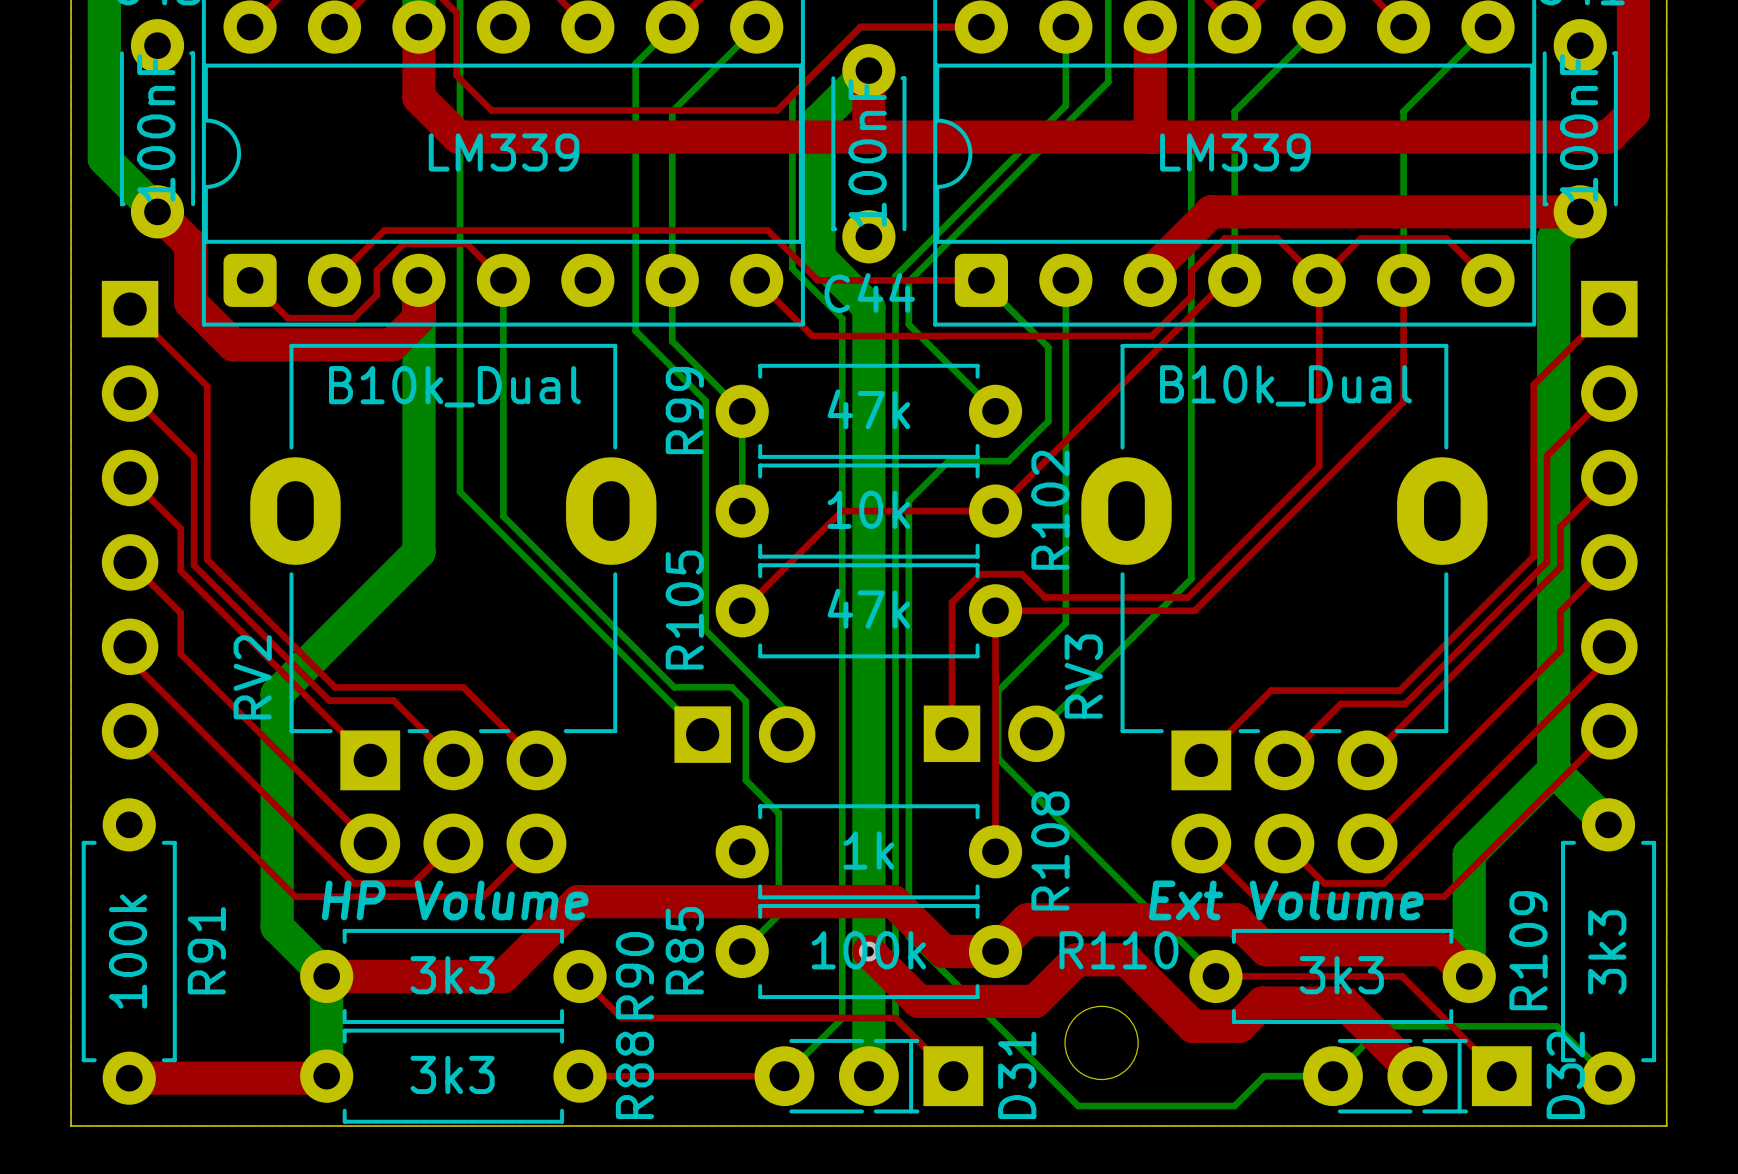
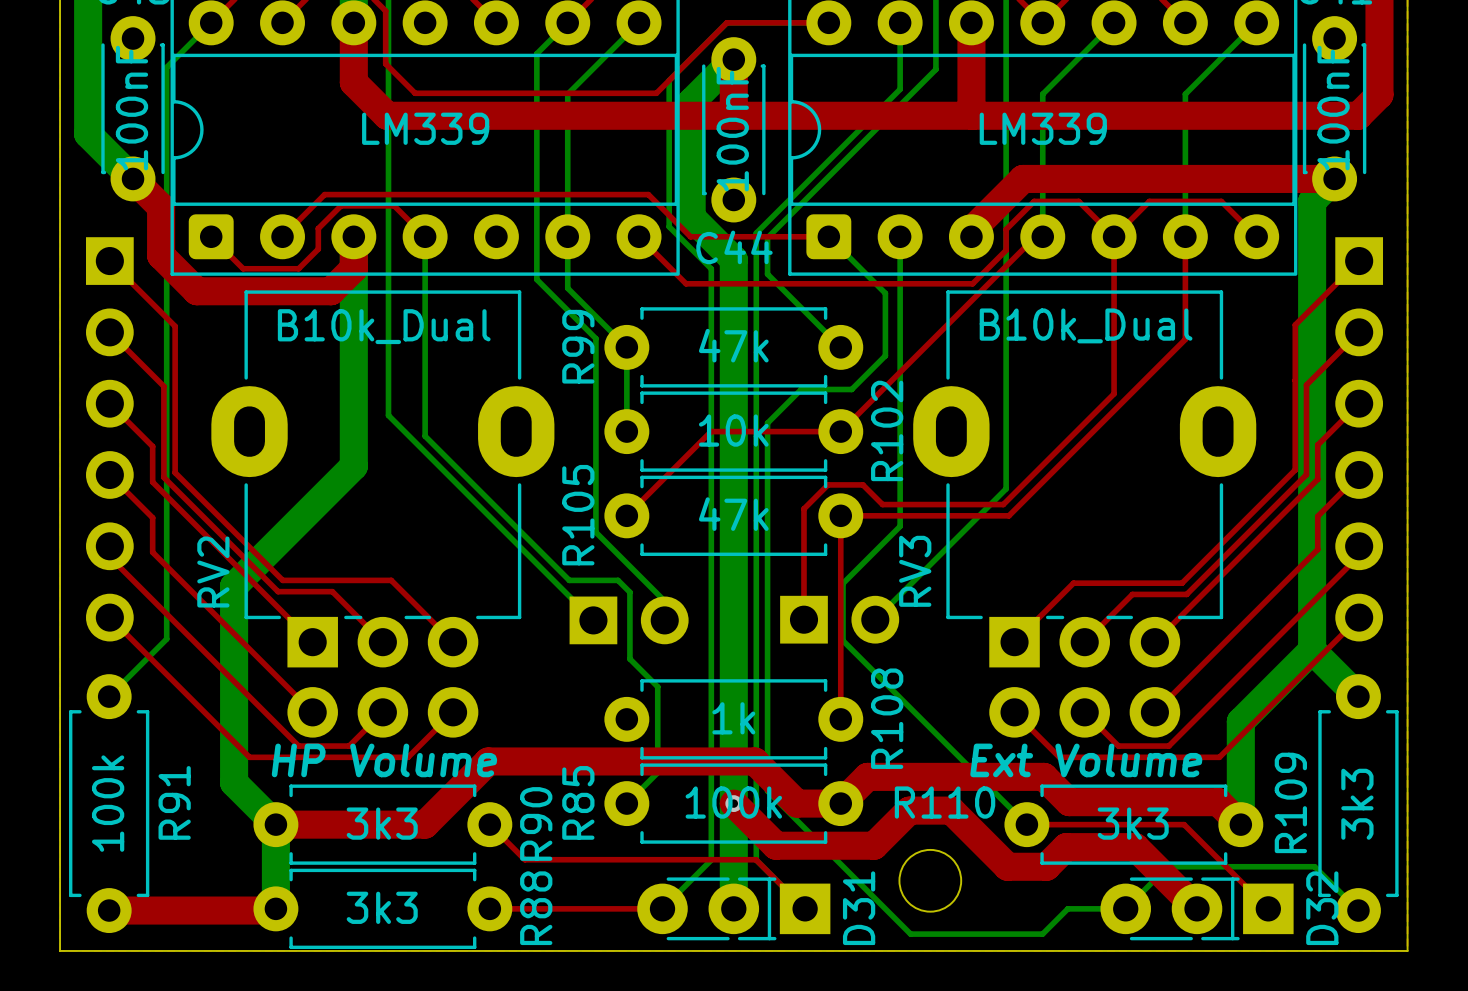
bottom track: none -> (211, 22) (166, 67) (166, 639) (109, 696)

